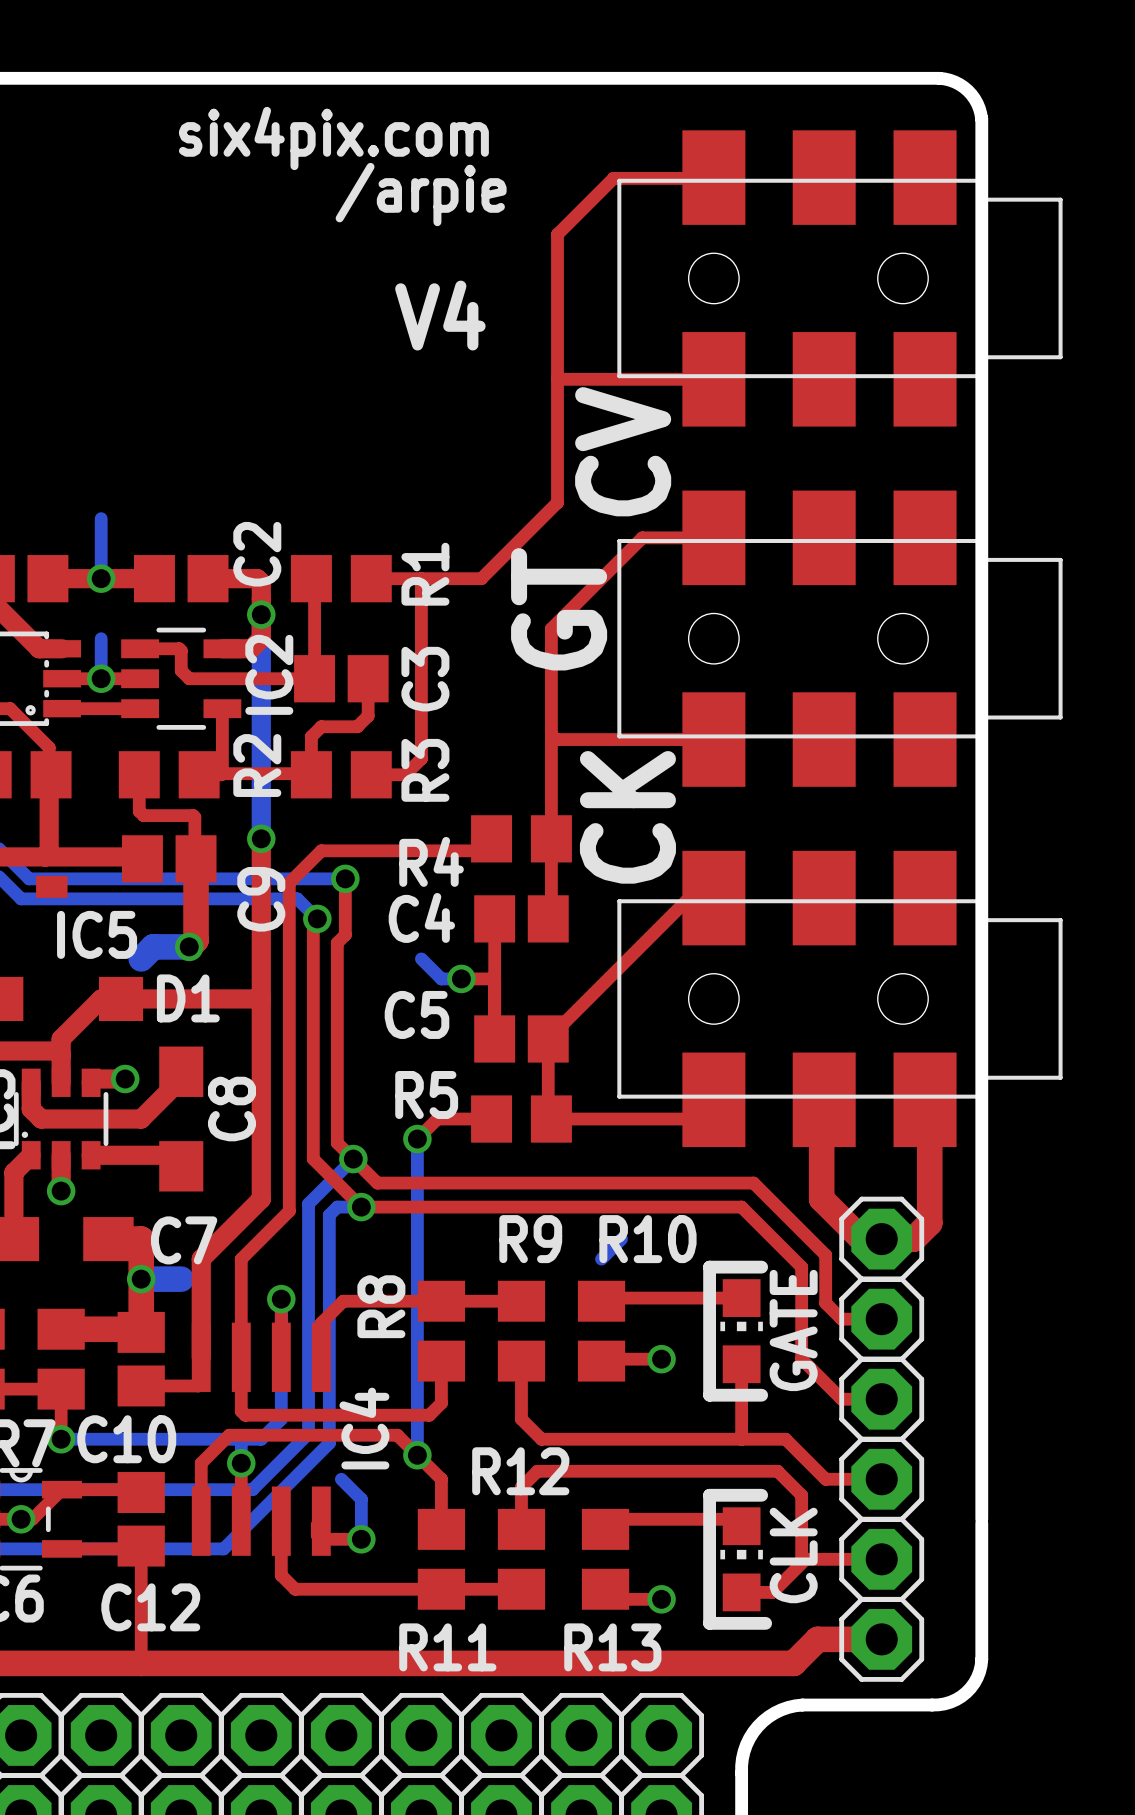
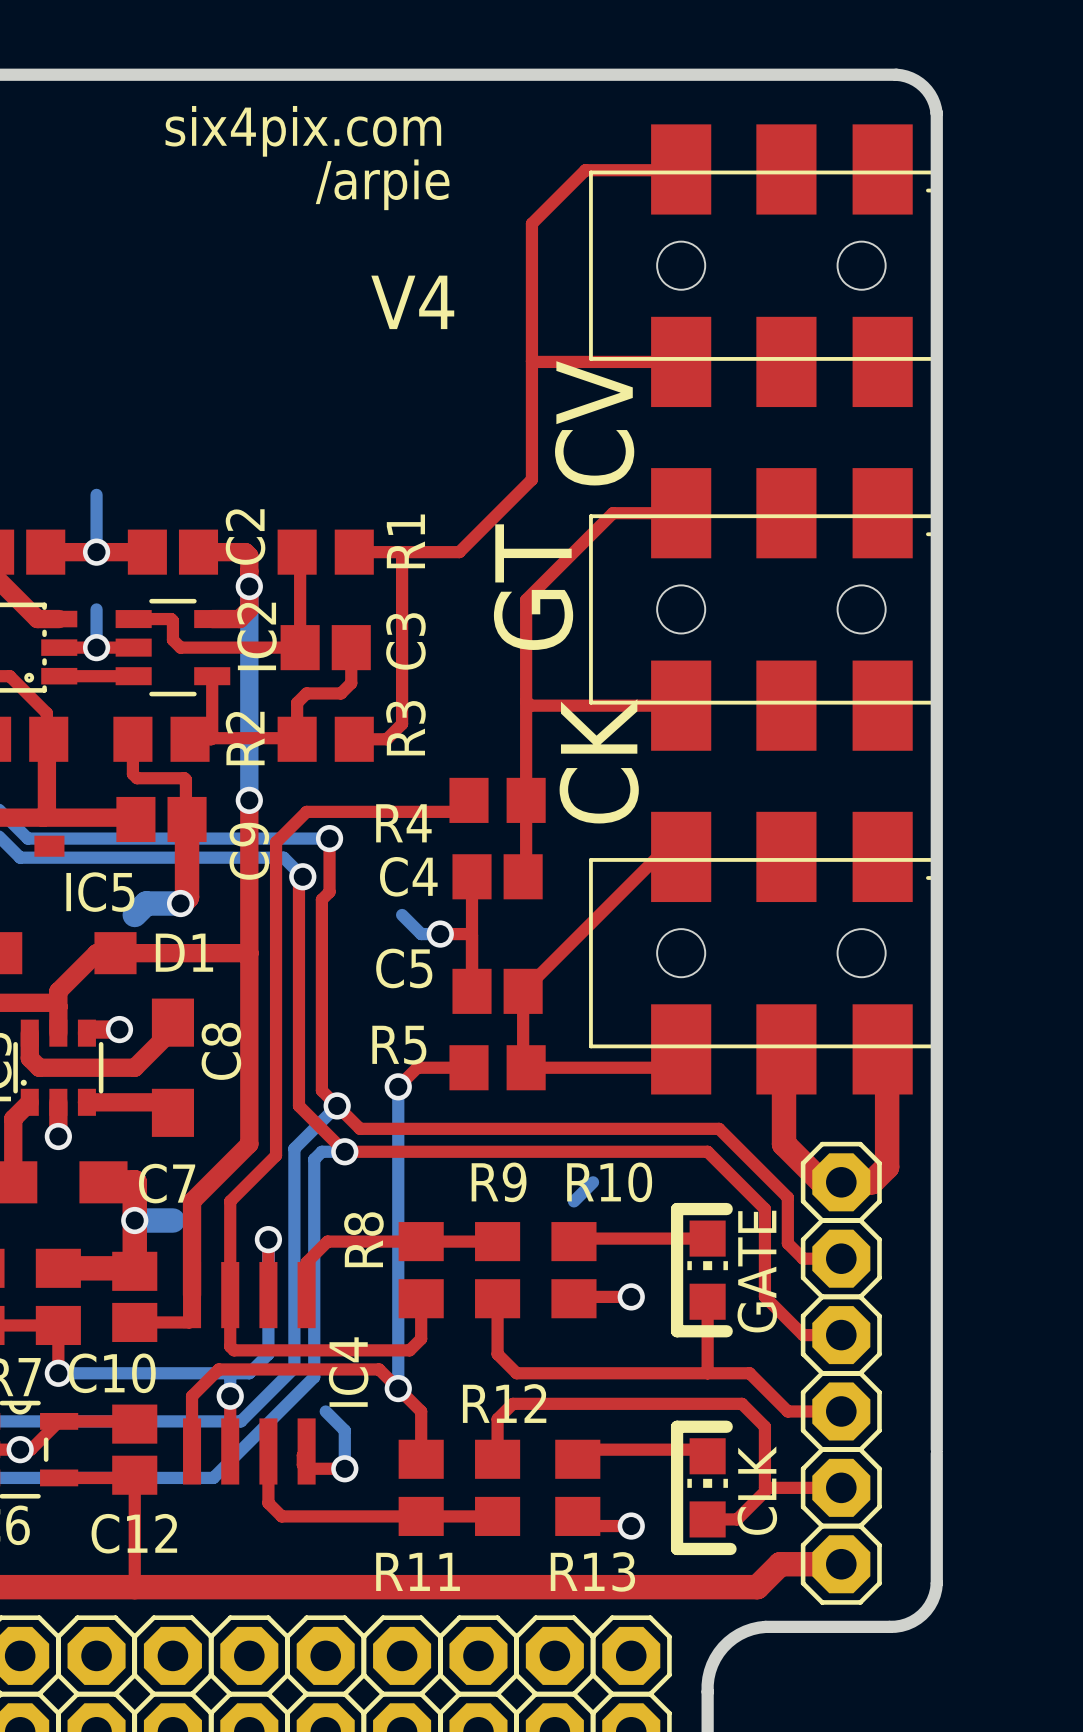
part: none -> (763, 265)
part: (839, 278) -> none
part: none -> (763, 609)
part: (839, 638) -> none
part: none -> (763, 953)
part: (839, 998) -> none

